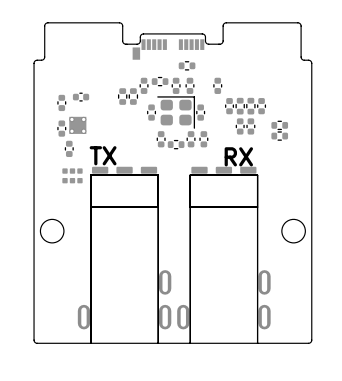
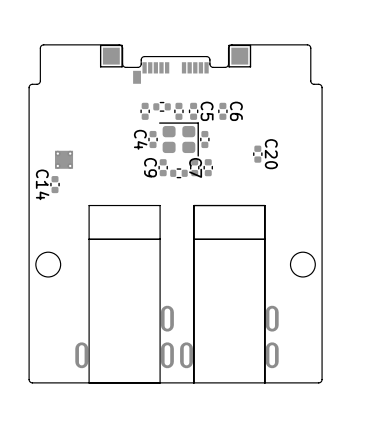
part: none -> (111, 56)
part: none -> (239, 56)
part: (187, 65) -> none
C5 name: none -> C5 (207, 111)
C6 name: none -> C6 (236, 111)
part: (122, 96) -> none
part: (133, 96) -> none
part: (81, 97) -> none
part: (61, 102) -> none
part: (229, 106) -> none
part: (240, 106) -> none
part: (250, 106) -> none
part: (261, 106) -> none
C4 name: none -> C4 (140, 139)
part: (77, 125) -> none
part: (279, 125) -> none
part: (240, 126) -> none
C20 name: none -> C20 (271, 154)
part: (61, 128) -> none
part: none -> (64, 159)
part: (279, 136) -> none
C9 name: none -> C9 (150, 167)
C7 name: none -> C7 (195, 167)
part: (69, 148) -> none
C14: none -> (55, 184)
text: TX (103, 155) -> none
text: RX (238, 156) -> none
part: (72, 171) -> none
part: (72, 180) -> none
part: (124, 187) -> none
part: (223, 187) -> none
board edge: (158, 343) (158, 175) (90, 175) (90, 343) -> (160, 382) (89, 382)

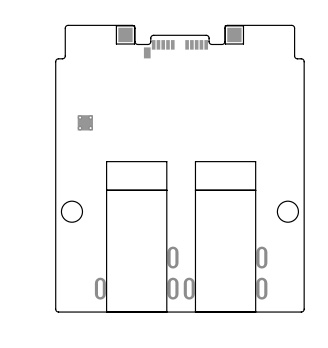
part: (162, 106) -> none
part: (145, 111) -> none
part: (178, 111) -> none
C5: (193, 111) -> none
C6: (222, 111) -> none
C4: (153, 139) -> none
part: (178, 139) -> none
part: (204, 139) -> none
C20: (257, 154) -> none
C9: (163, 167) -> none
part: (194, 167) -> none
C7: (208, 167) -> none
part: (178, 173) -> none
C14: (55, 184) -> none
board edge: (264, 382) (264, 205) (193, 205) (193, 382) -> (255, 312) (195, 312)

